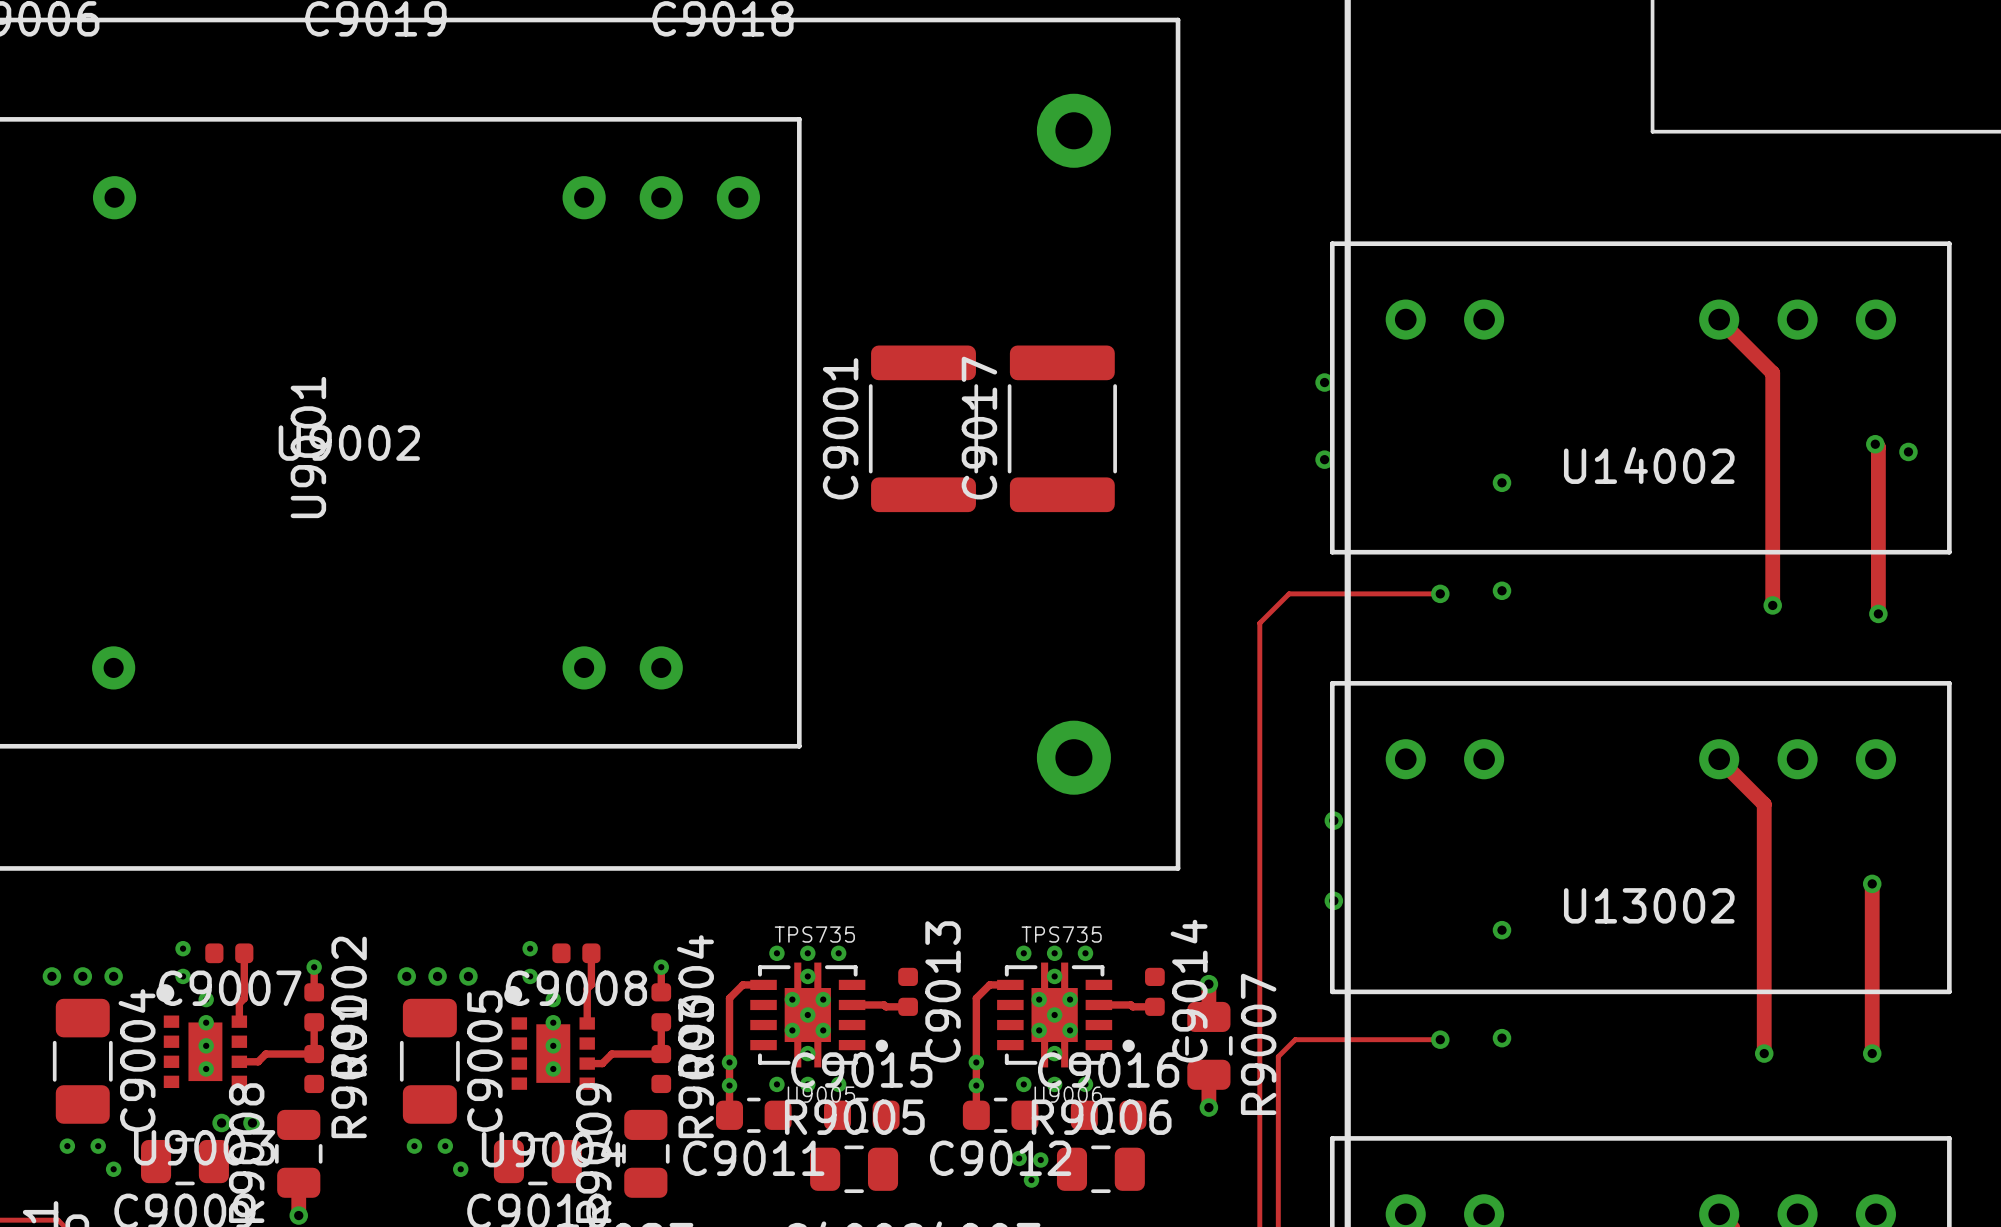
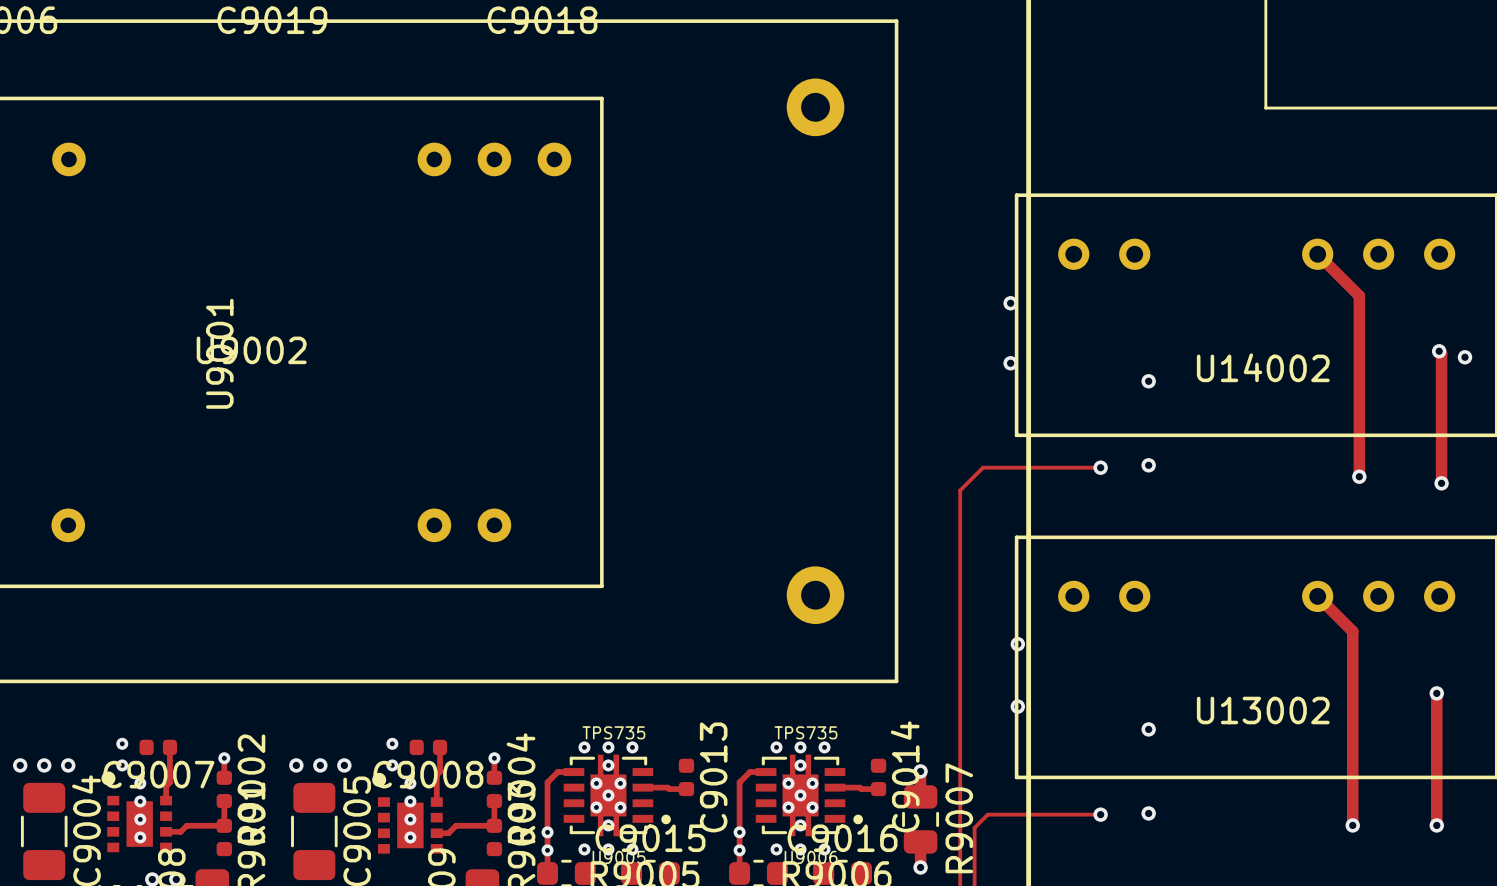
C9001: (923, 428) -> none
C9017: (1062, 428) -> none

